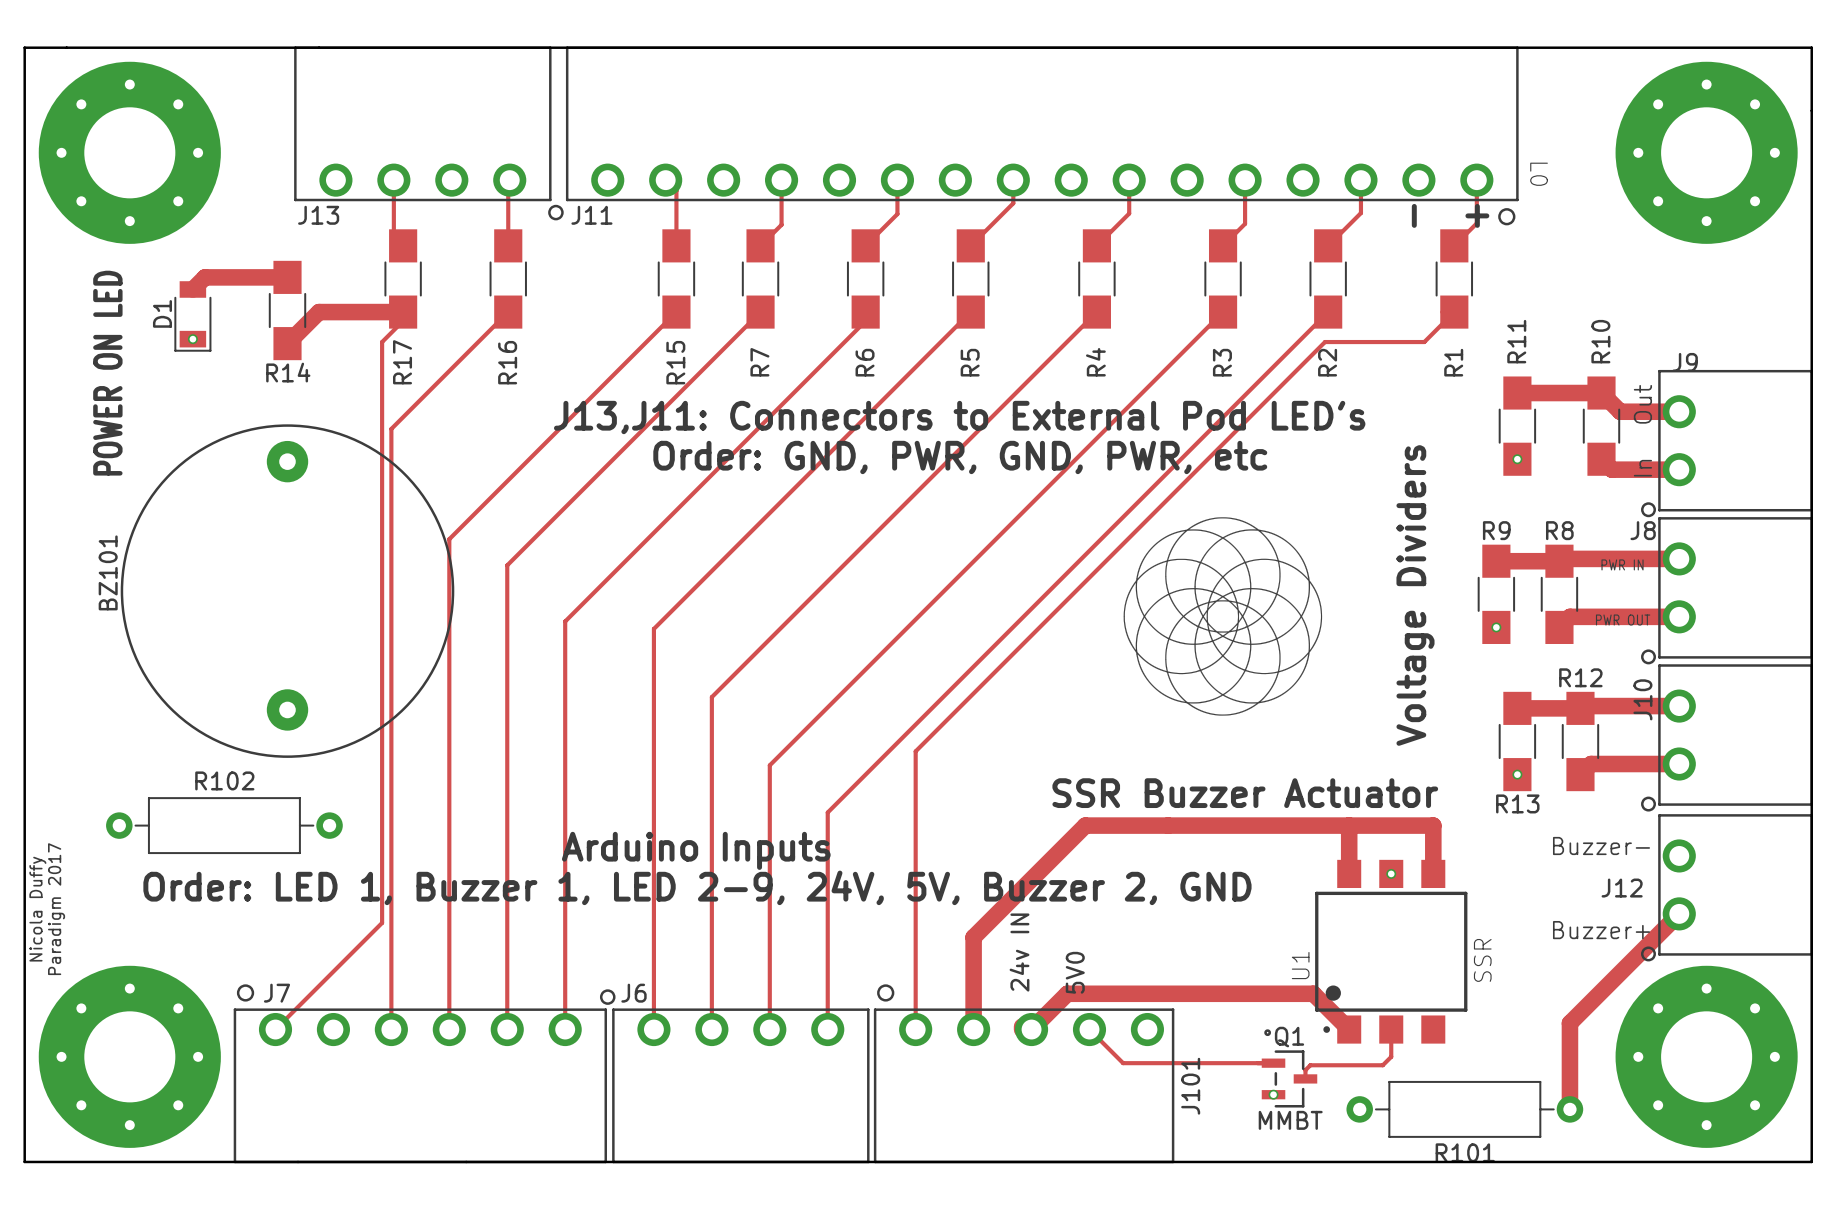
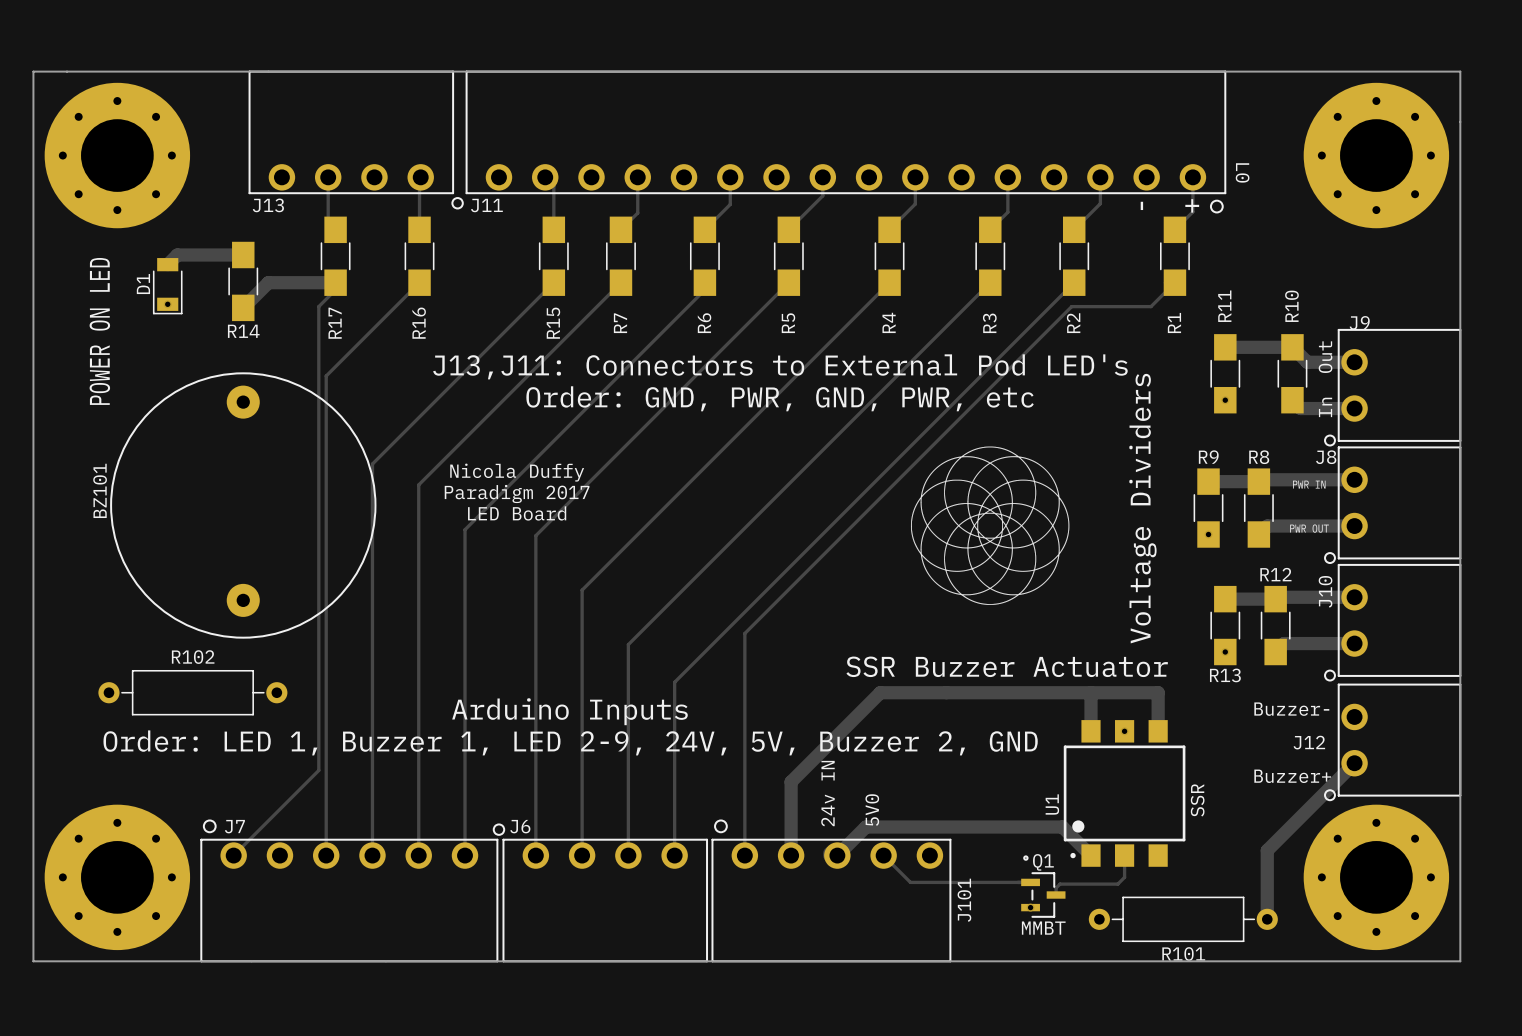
text: none -> Nicola Duffy (517, 472)
text: none -> Paradigm 2017 (517, 494)
text: none -> LED Board (517, 513)
text: Nicola Duffy (37, 909) -> none
text: Paradigm 2017 (56, 909) -> none

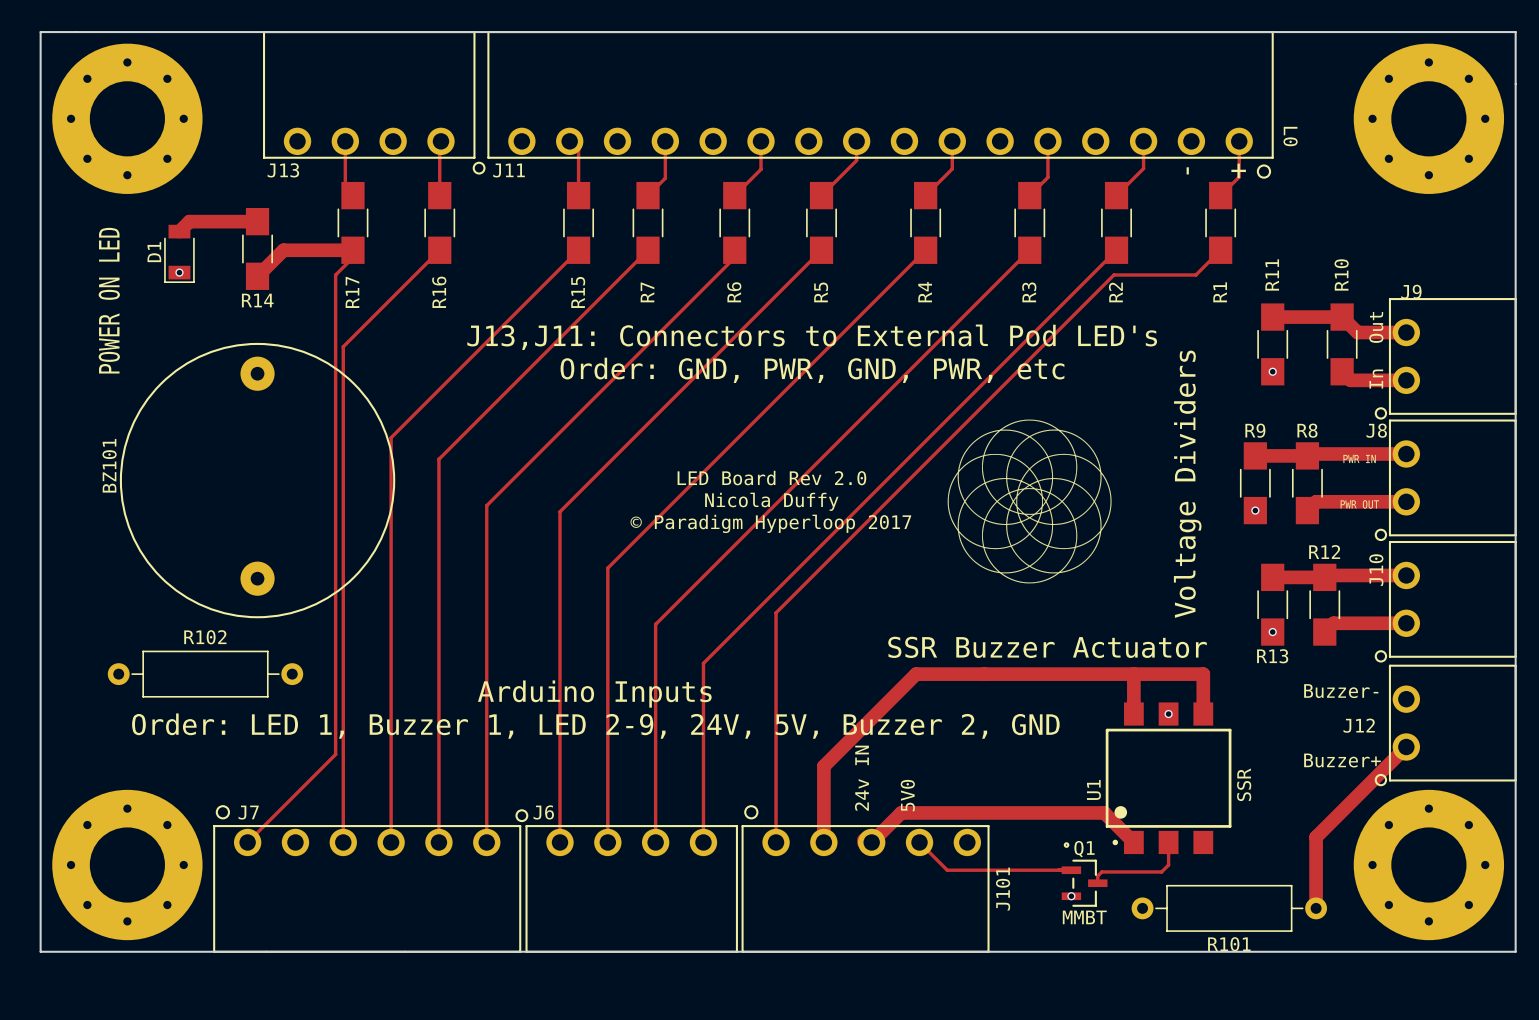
text position: Nicola Duffy (517, 472) -> Nicola Duffy (771, 501)
text: Paradigm 2017 (517, 494) -> none
text: none -> LED Board Rev 2.0 (771, 478)
text: LED Board (517, 513) -> none
text: none -> © Paradigm Hyperloop 2017 (770, 523)

